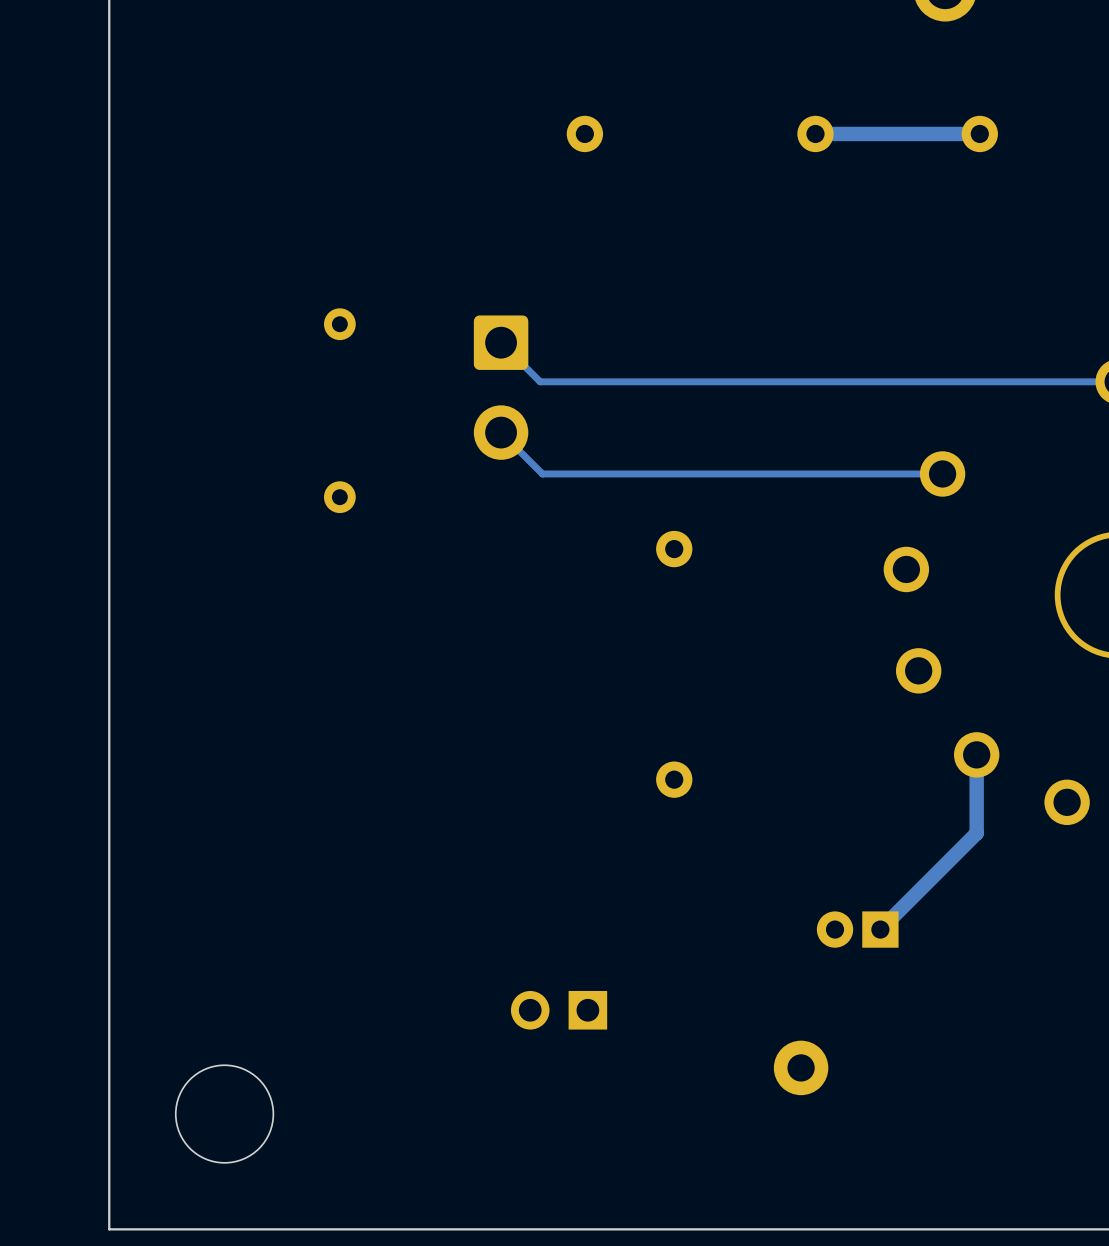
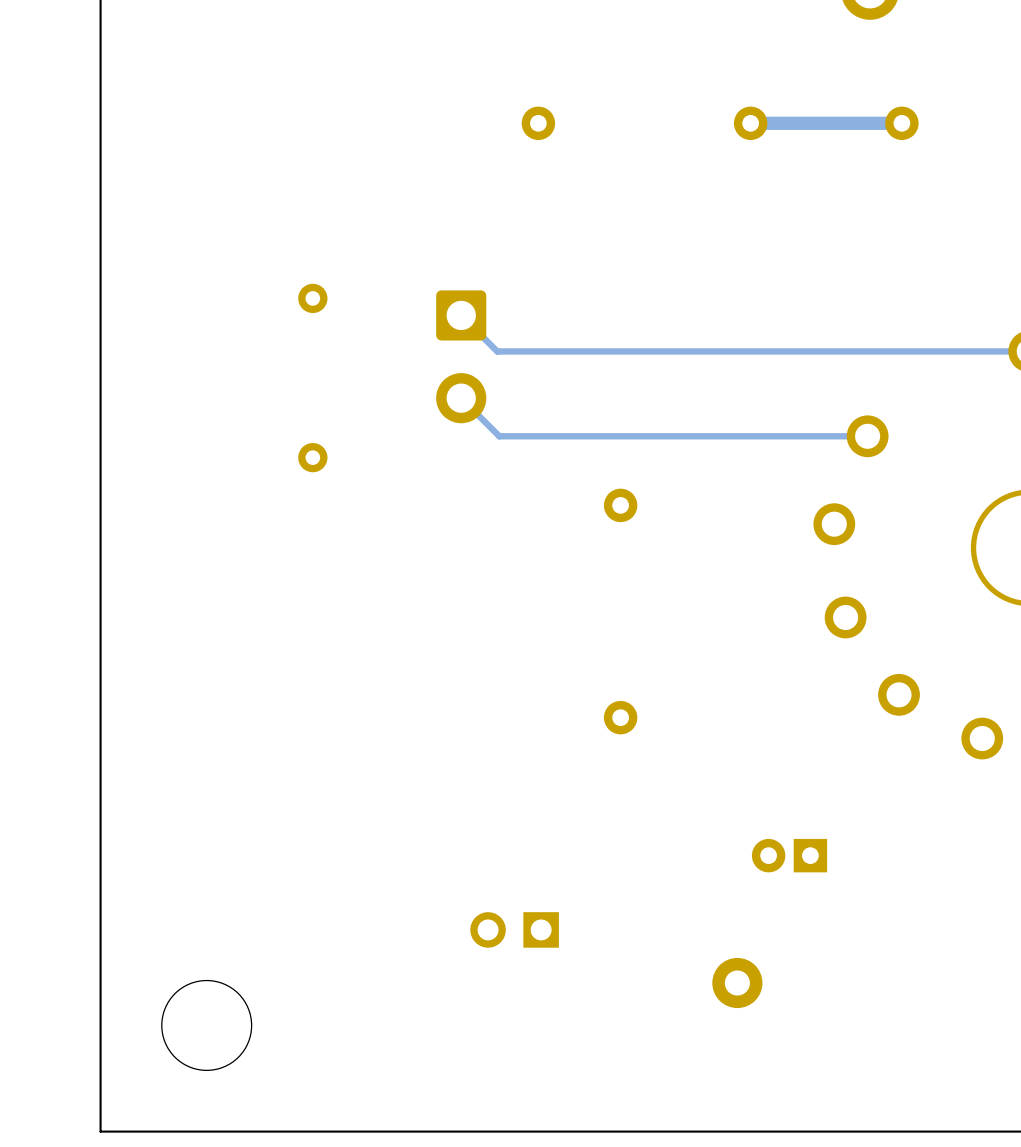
track: (976, 754) (976, 833) (880, 929) -> none

